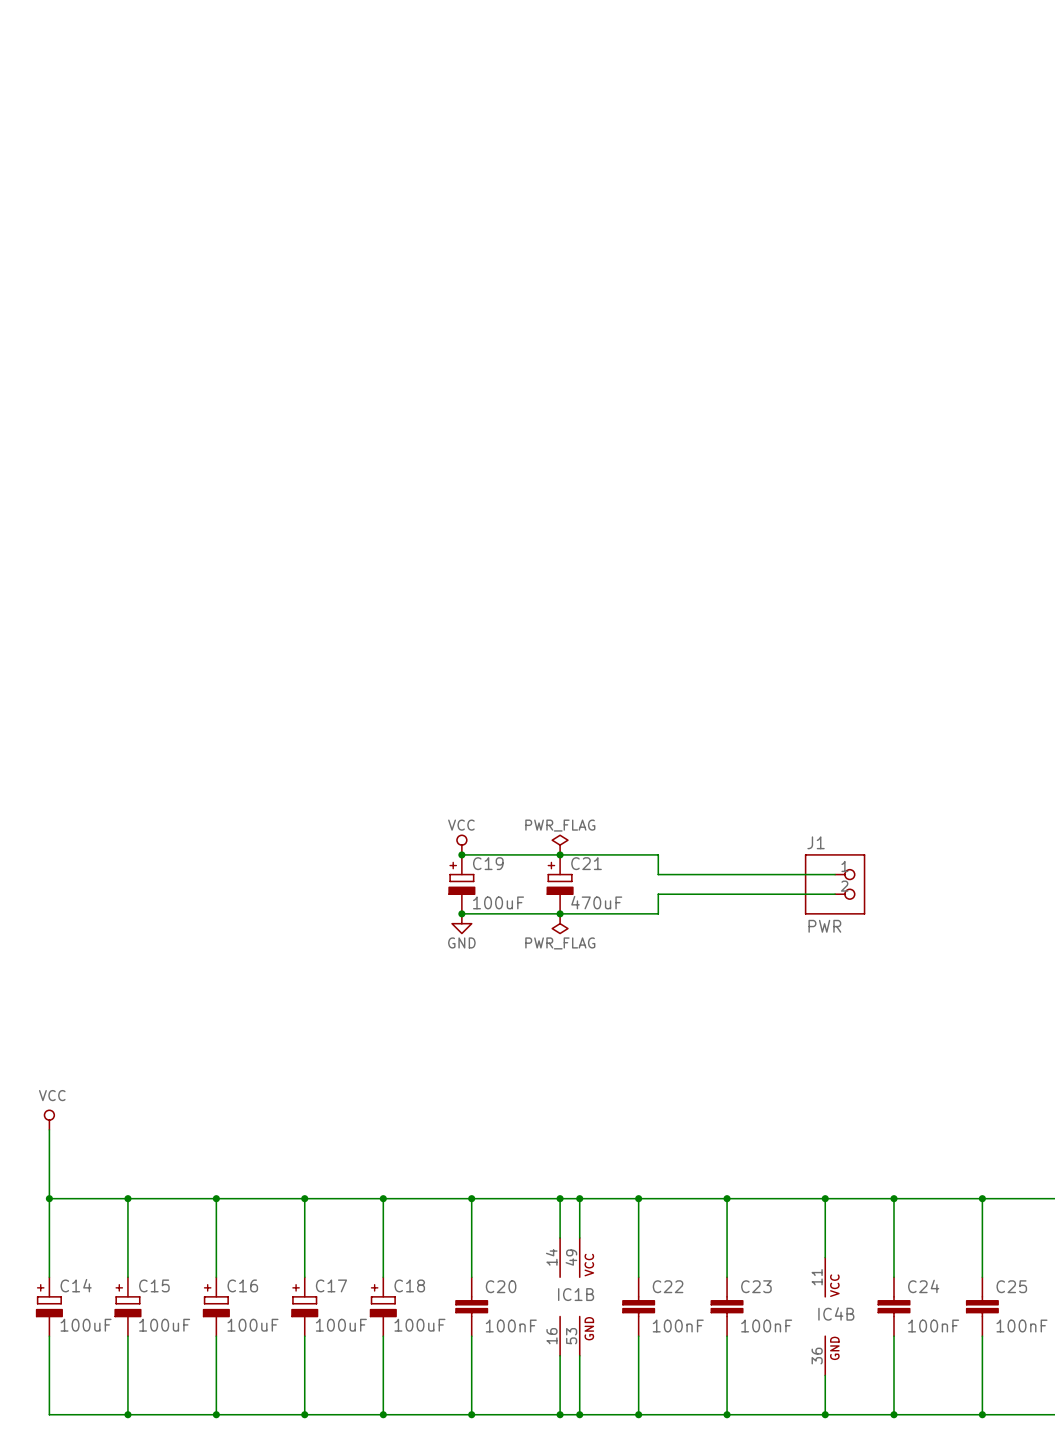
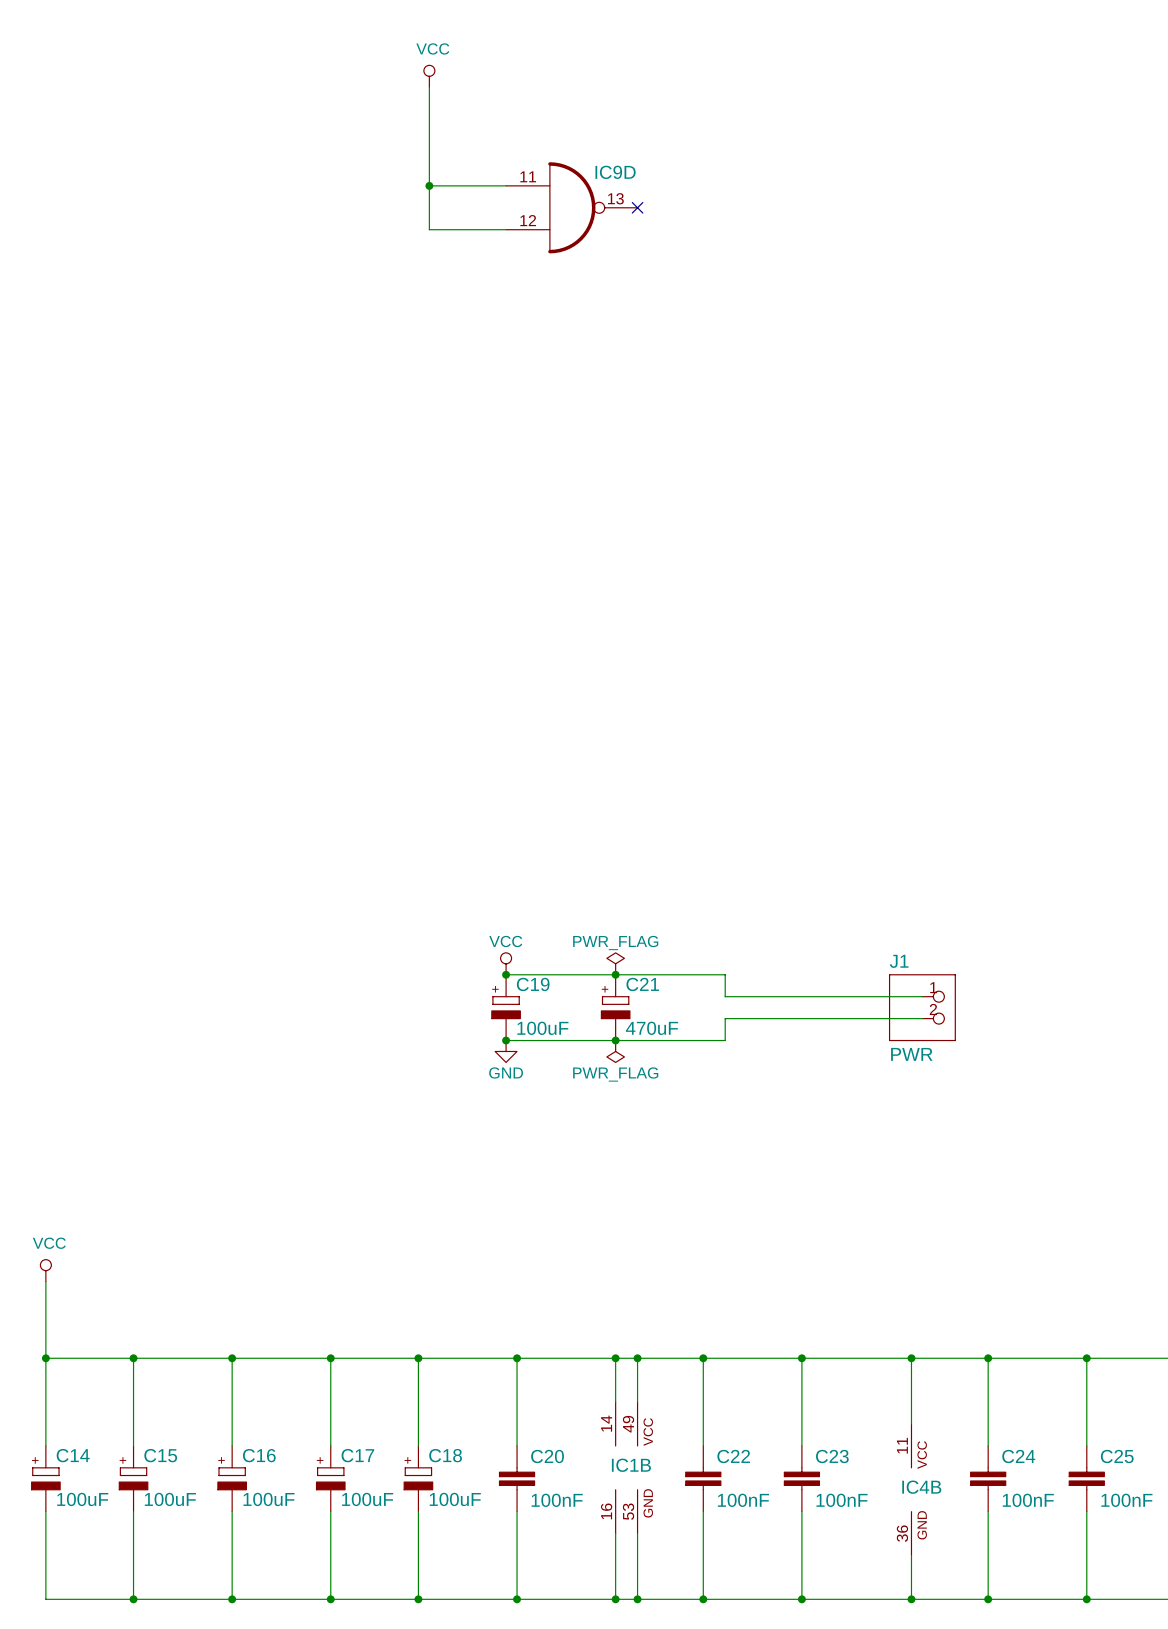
power symbol: none -> VCC (429, 76)
wire: none -> (429, 87) (429, 229) (506, 229)
wire: none -> (429, 185) (506, 185)
junction: none -> (429, 185)
IC9D: none -> (571, 207)
no-connect mark: none -> (637, 207)

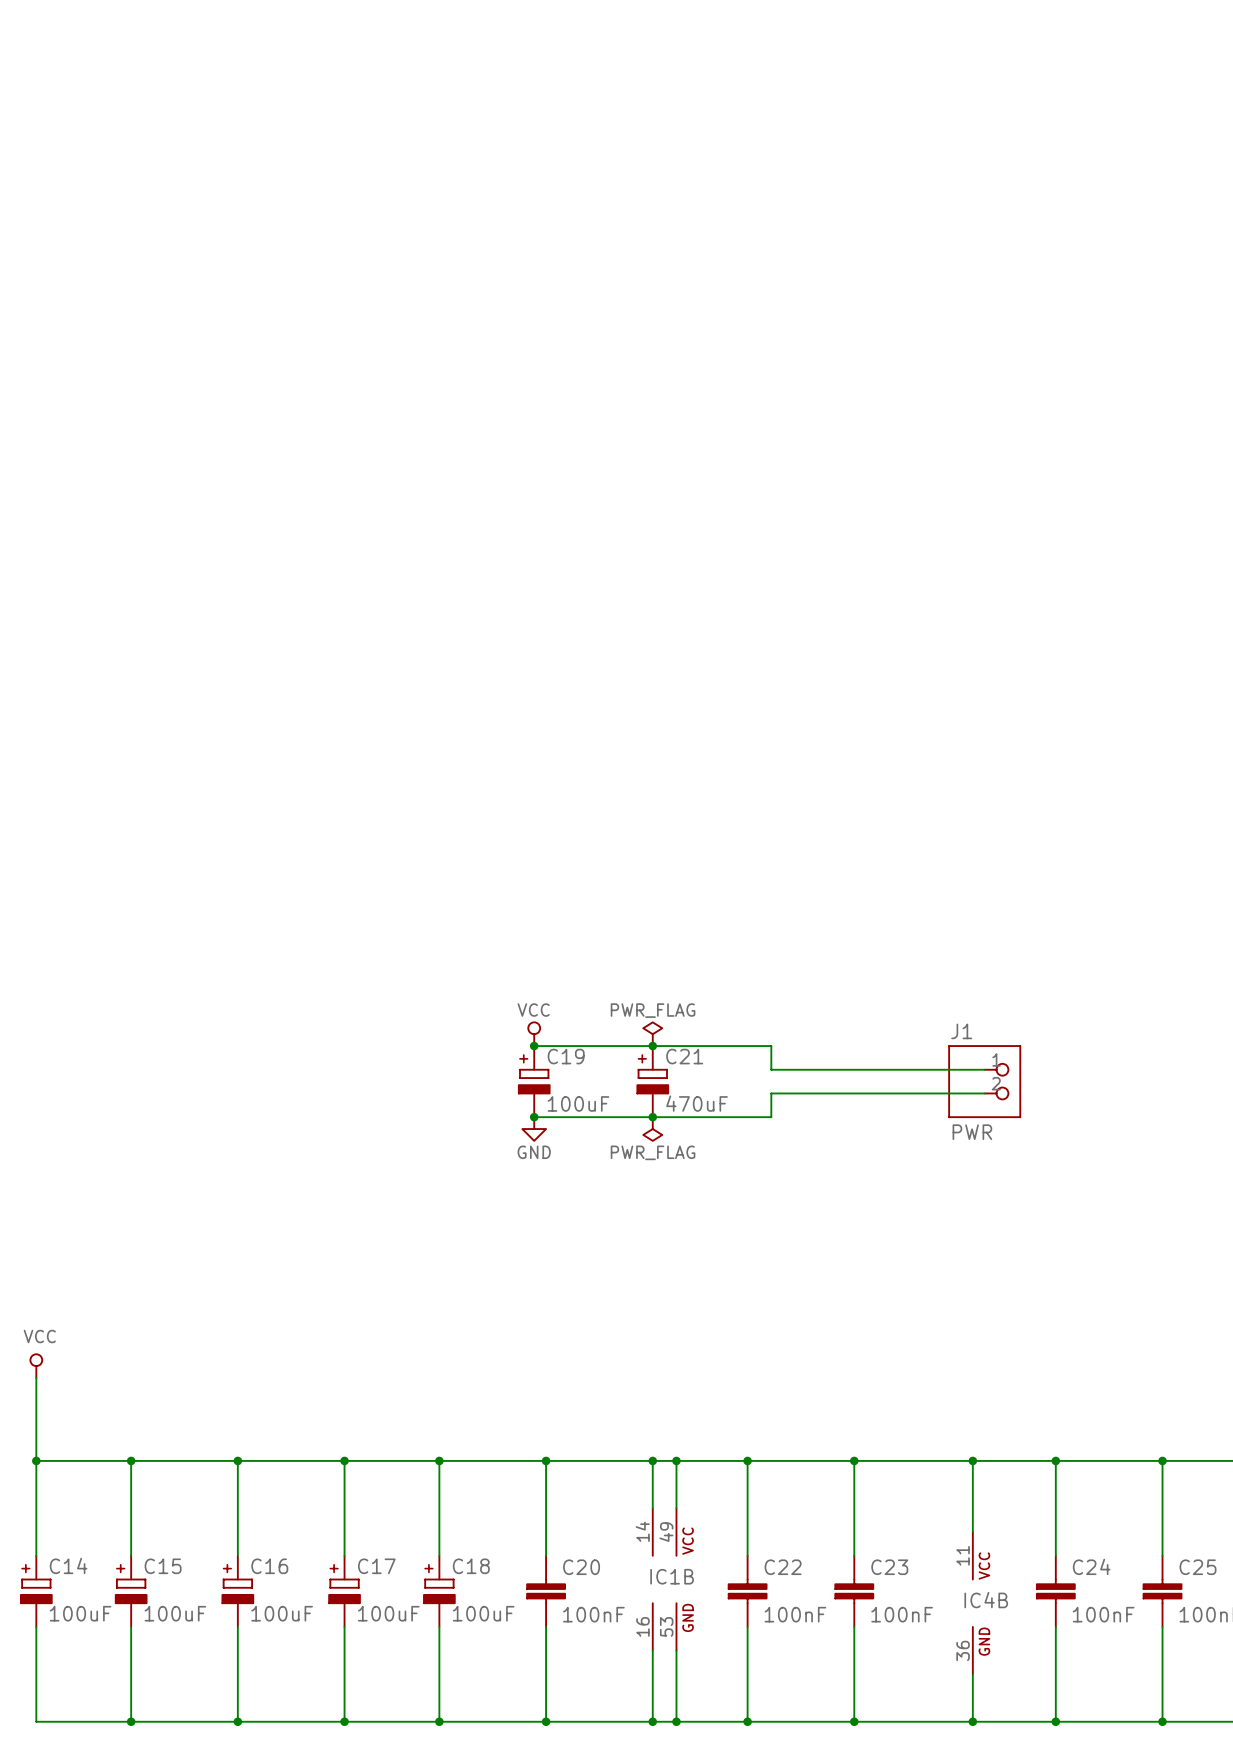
power symbol: VCC (429, 76) -> none
wire: (429, 87) (429, 229) (506, 229) -> none
wire: (429, 185) (506, 185) -> none
junction: (429, 185) -> none
IC9D: (571, 207) -> none
no-connect mark: (637, 207) -> none

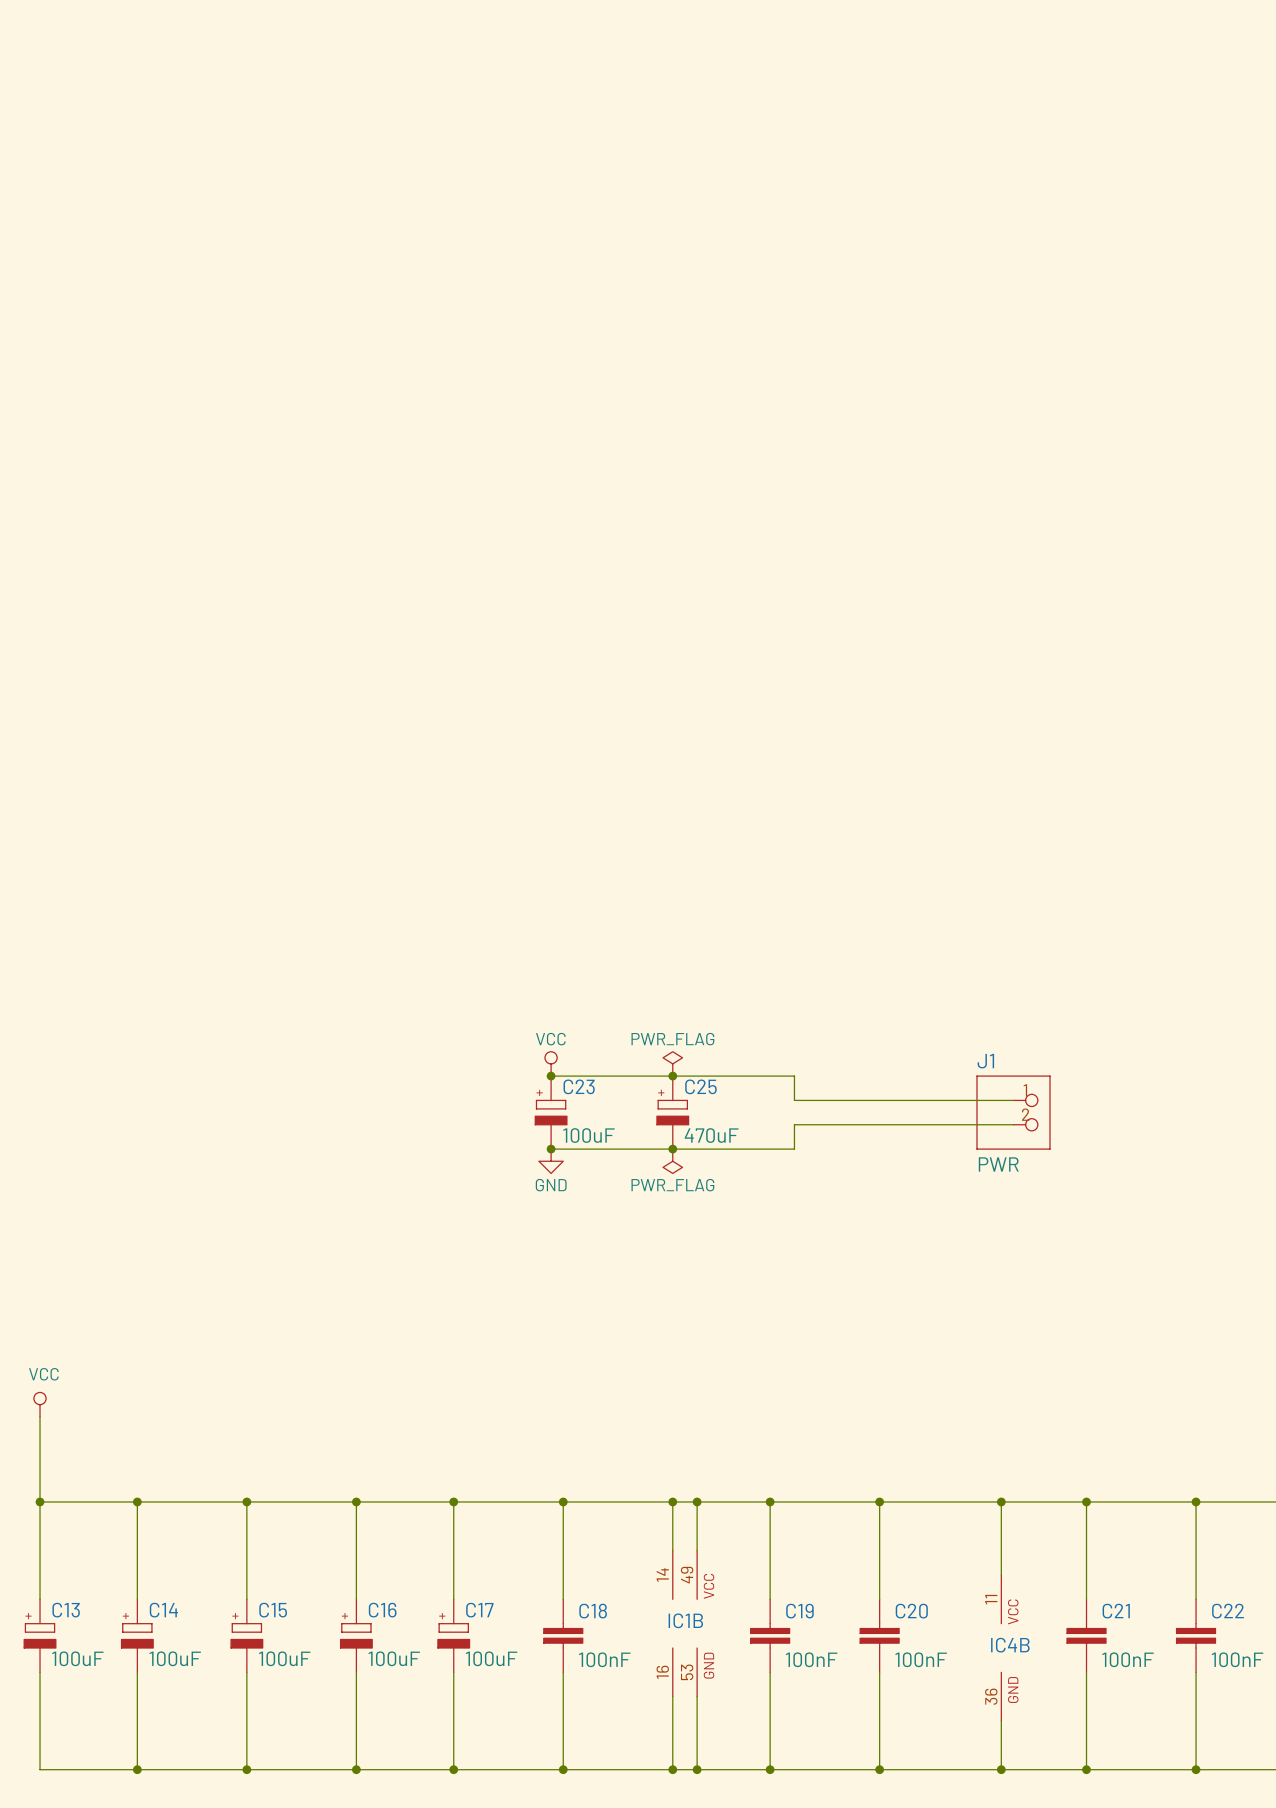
C19 name: C19 (566, 1056) -> C23 (579, 1086)
C21 name: C21 (684, 1056) -> C25 (700, 1086)
C14 name: C14 (68, 1565) -> C13 (66, 1610)
C15 name: C15 (163, 1566) -> C14 (163, 1610)
C16 name: C16 (269, 1566) -> C15 (273, 1610)
C17 name: C17 (376, 1566) -> C16 (382, 1610)
C18 name: C18 (471, 1566) -> C17 (479, 1610)
C24 name: C24 (1091, 1566) -> C21 (1116, 1611)
C20 name: C20 (581, 1567) -> C18 (593, 1611)
C22 name: C22 (783, 1567) -> C19 (799, 1611)
C23 name: C23 (889, 1567) -> C20 (911, 1611)
C25 name: C25 (1197, 1567) -> C22 (1227, 1611)

